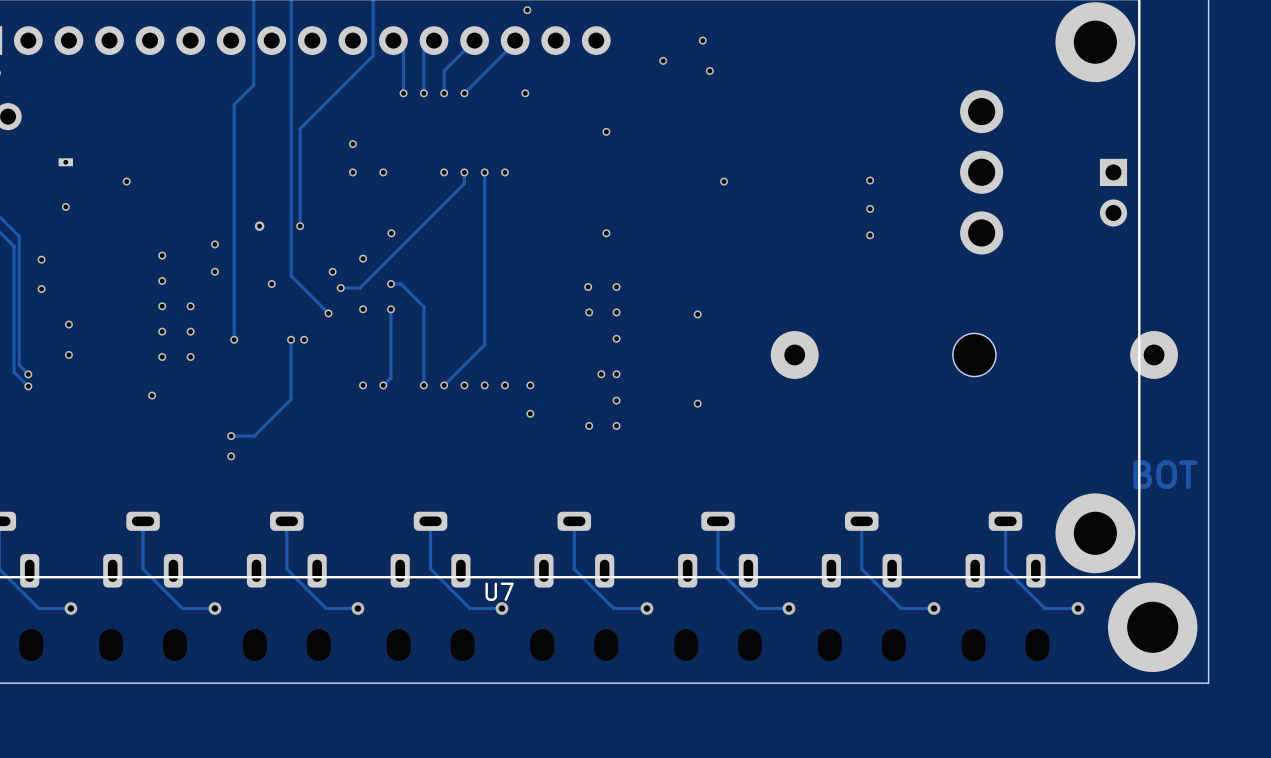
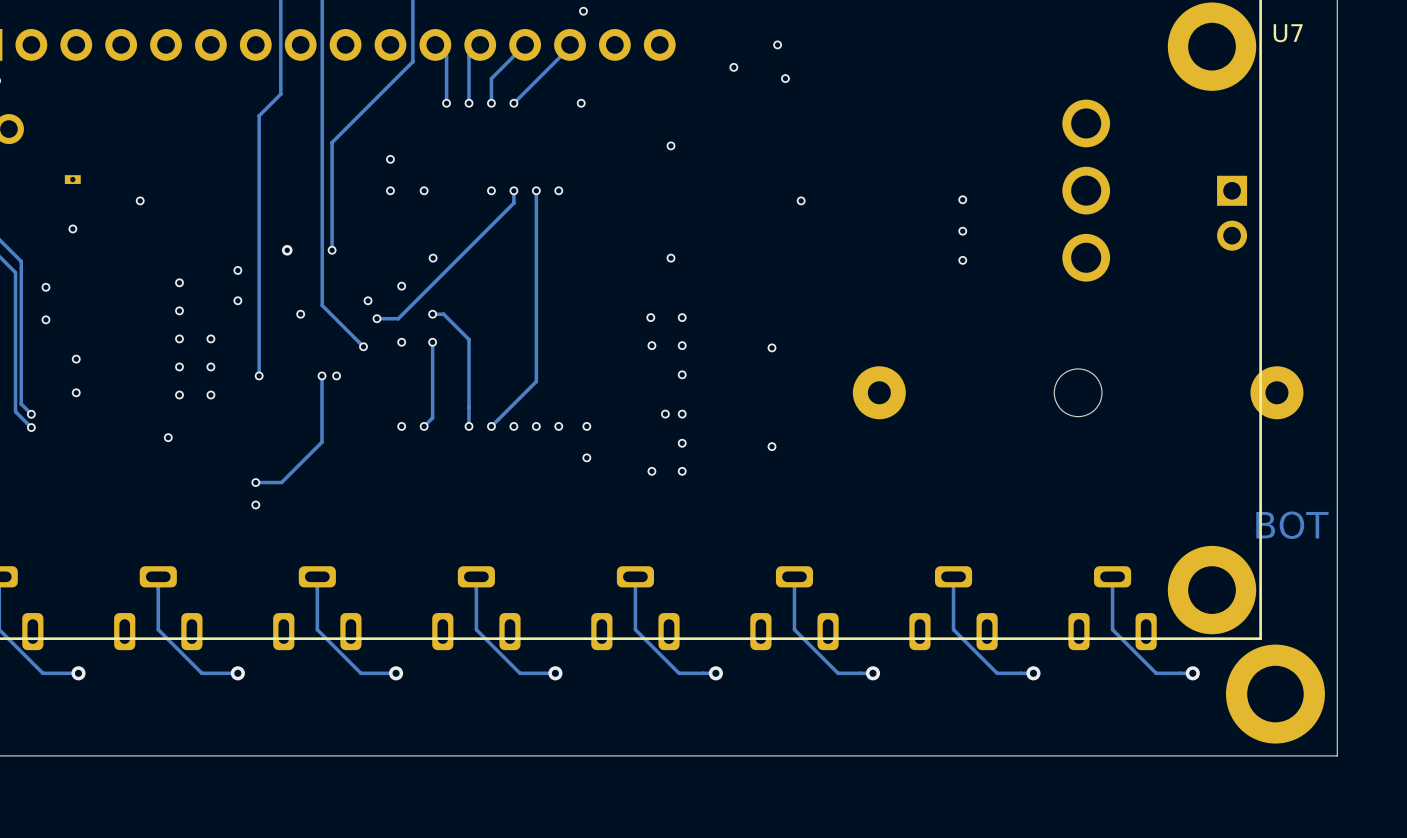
U7 name position: U7 (499, 591) -> U7 (1288, 33)

